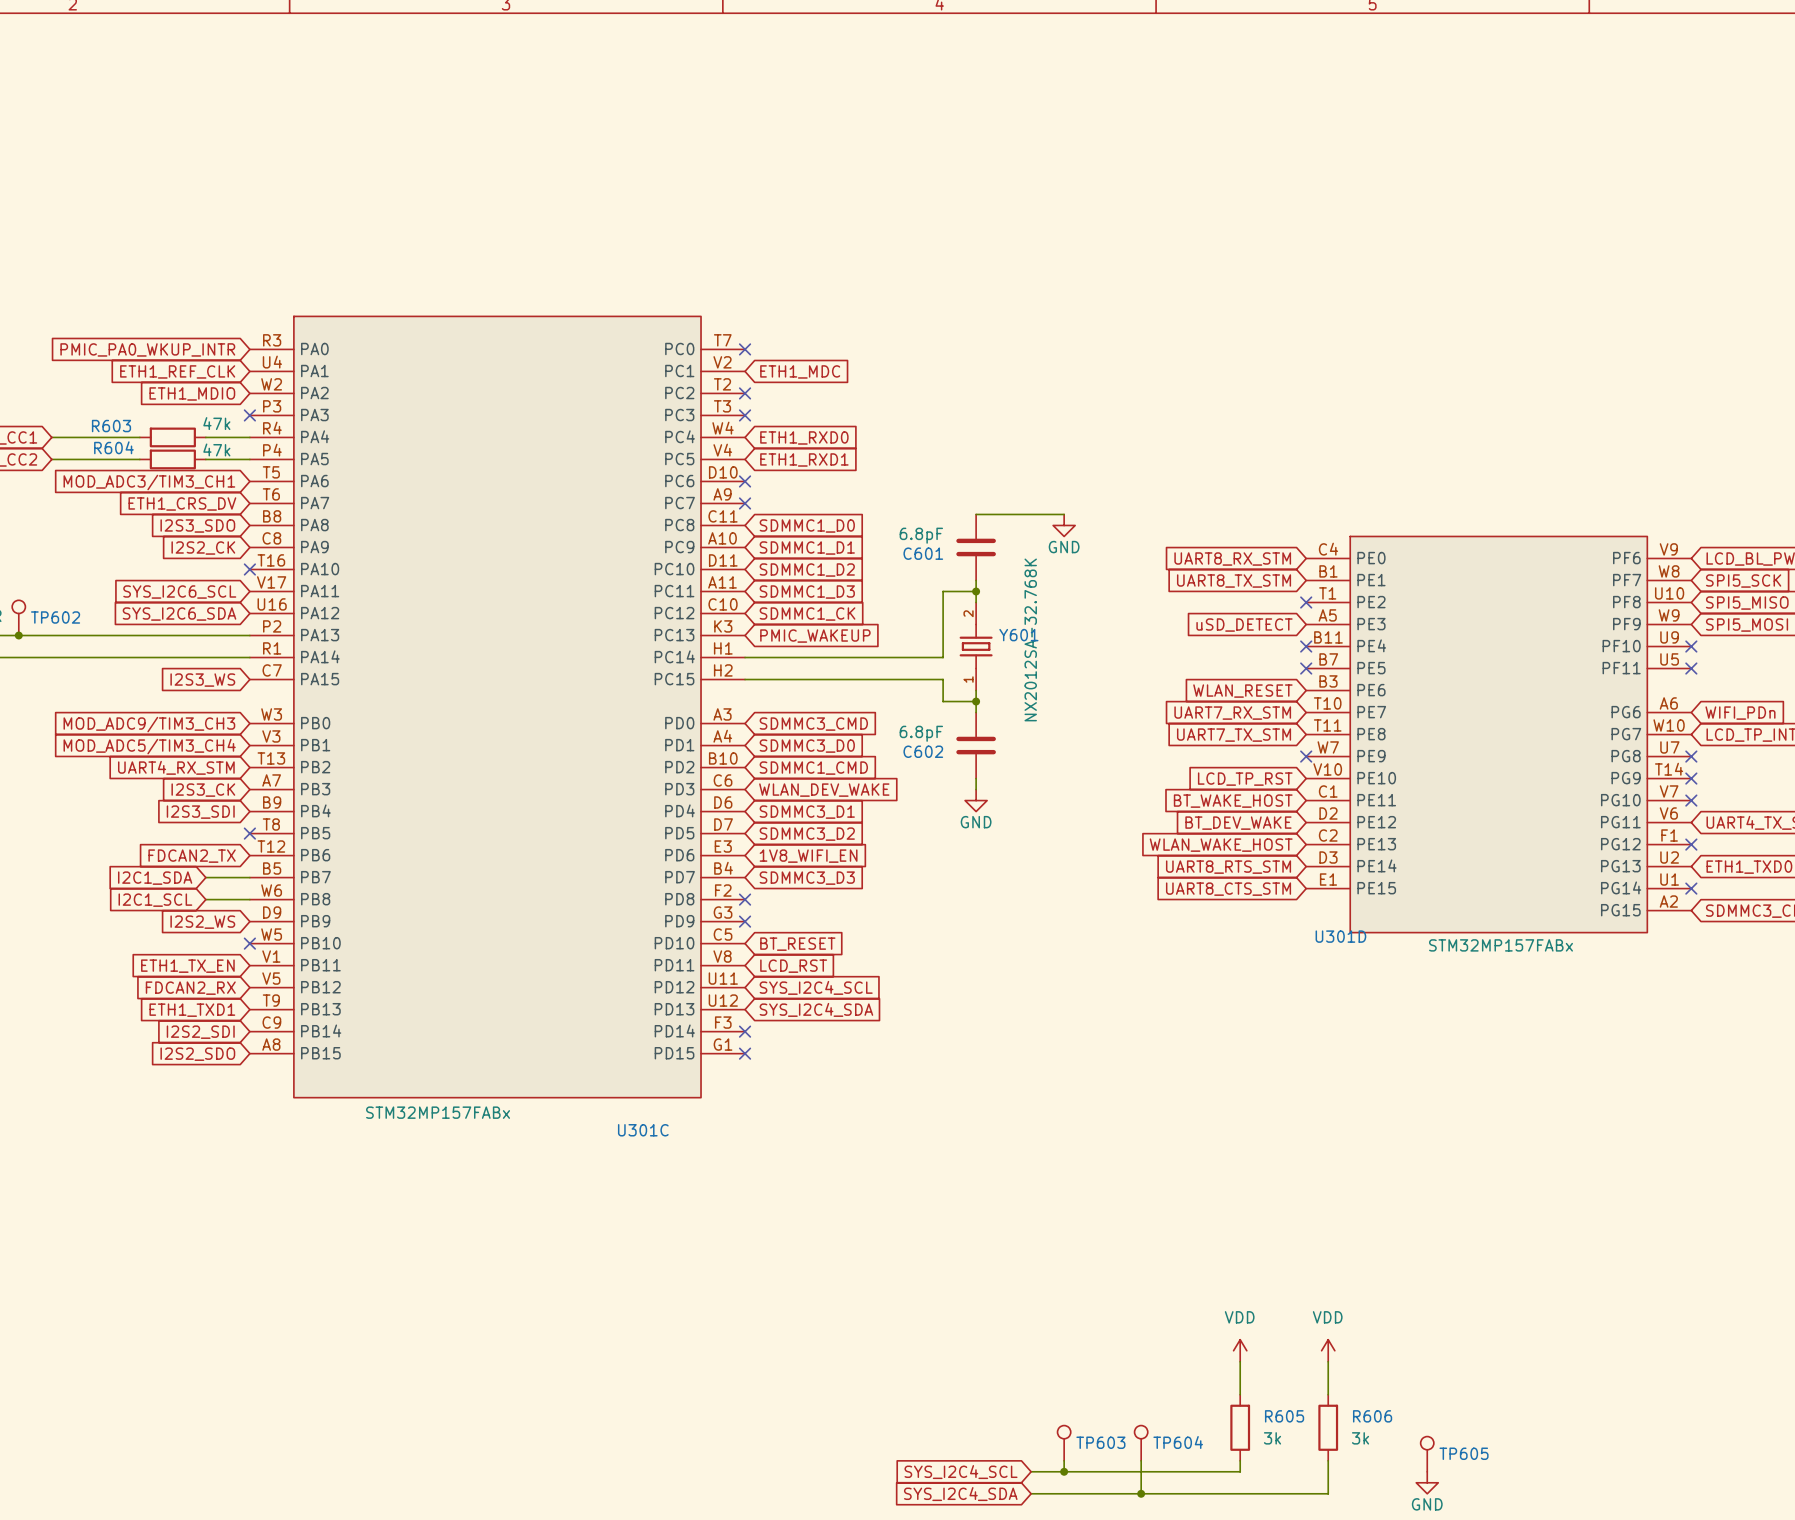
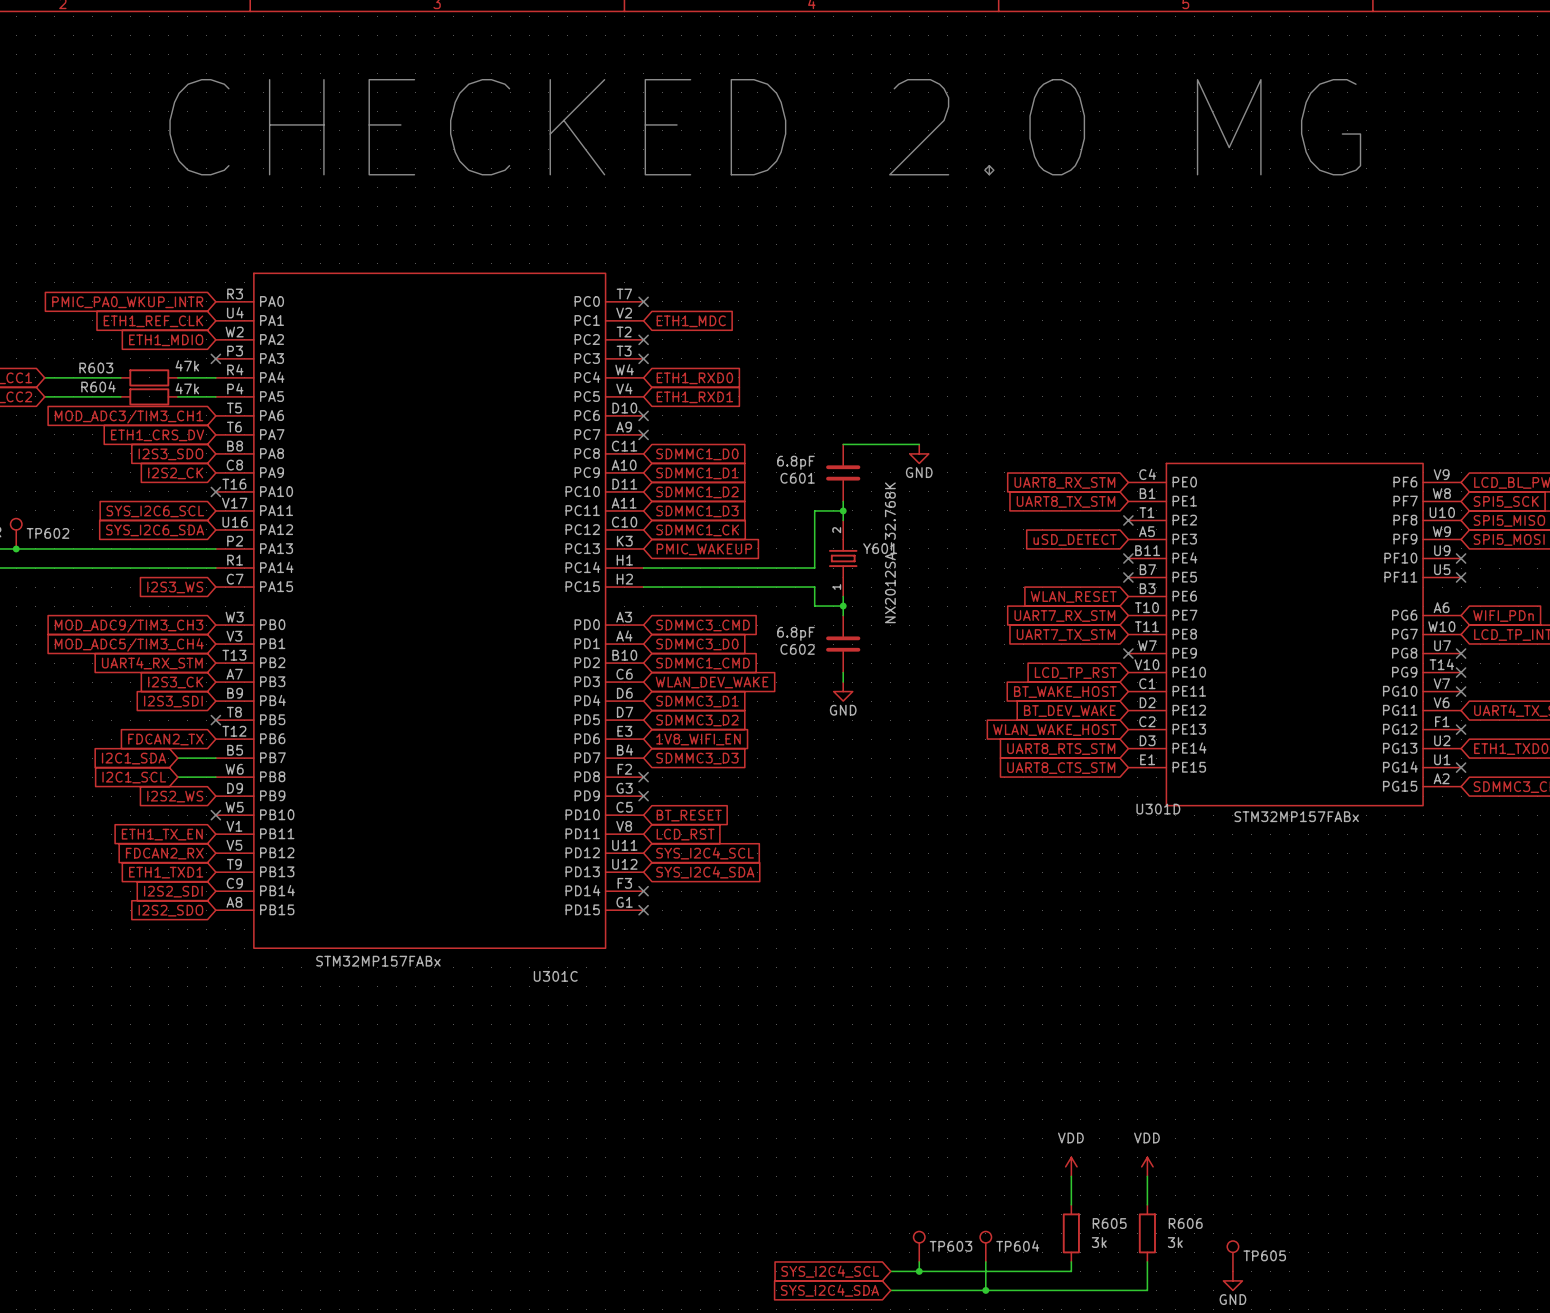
text: none -> CHECKED 2.0 MG (765, 127)

